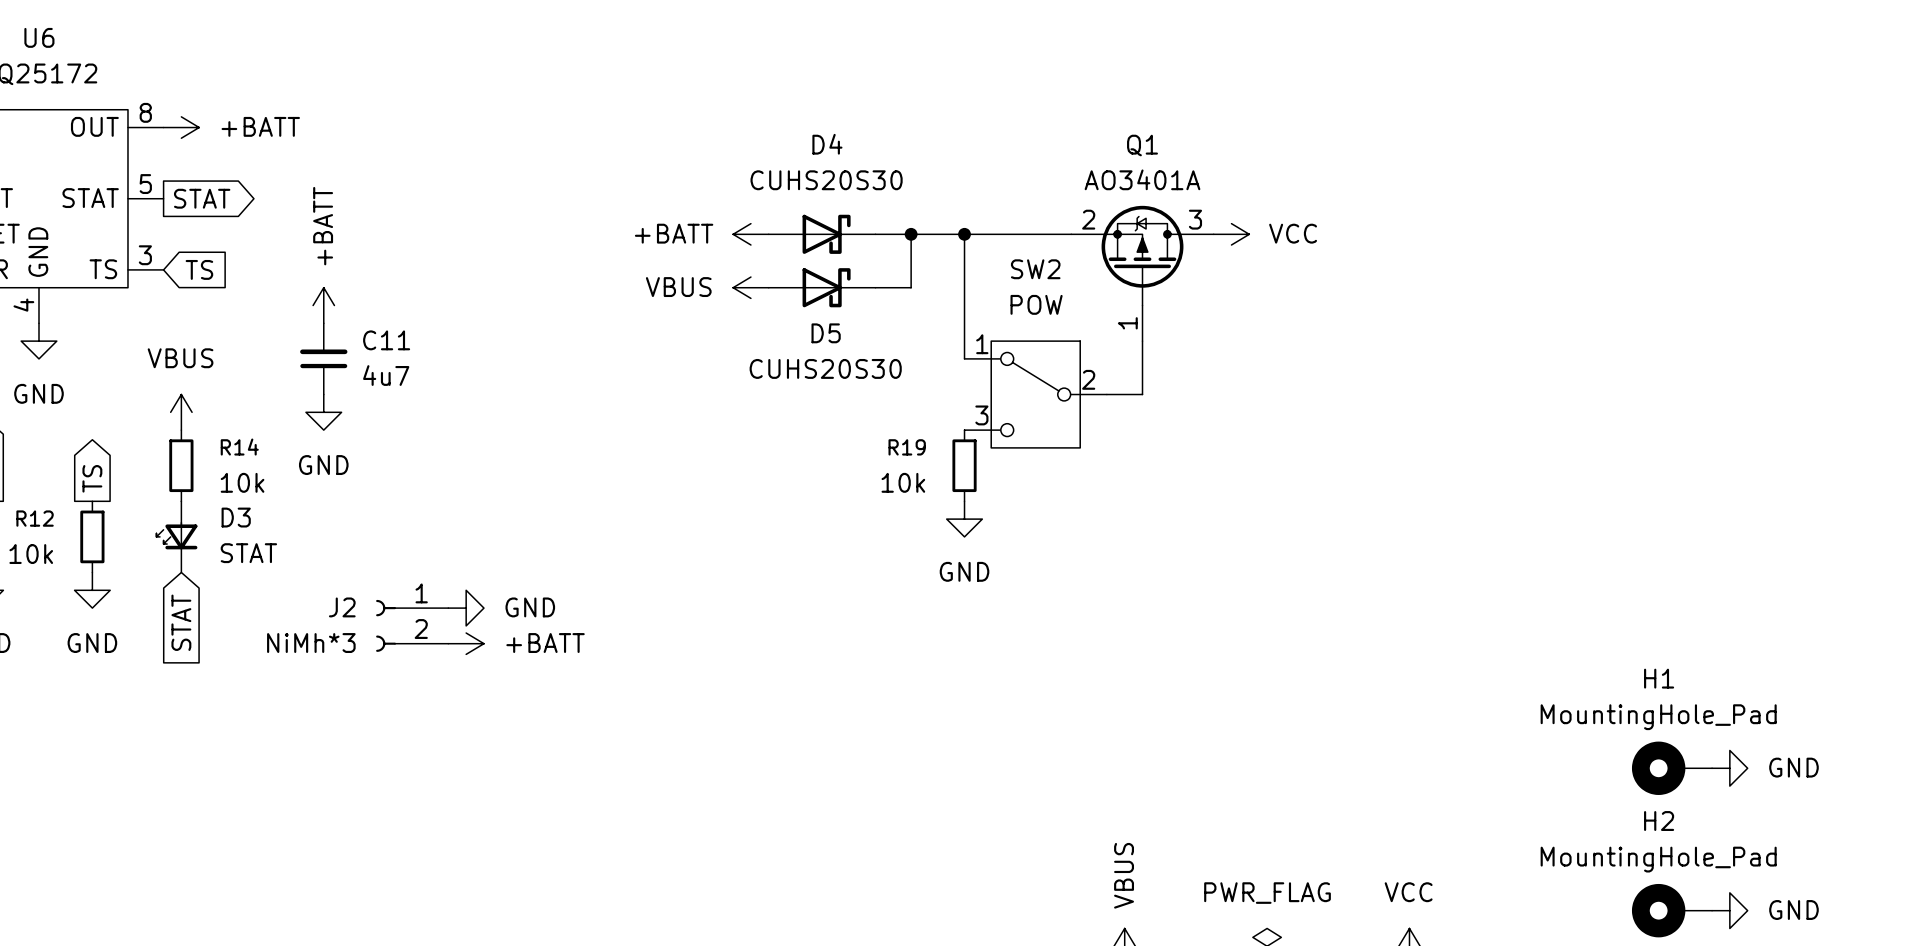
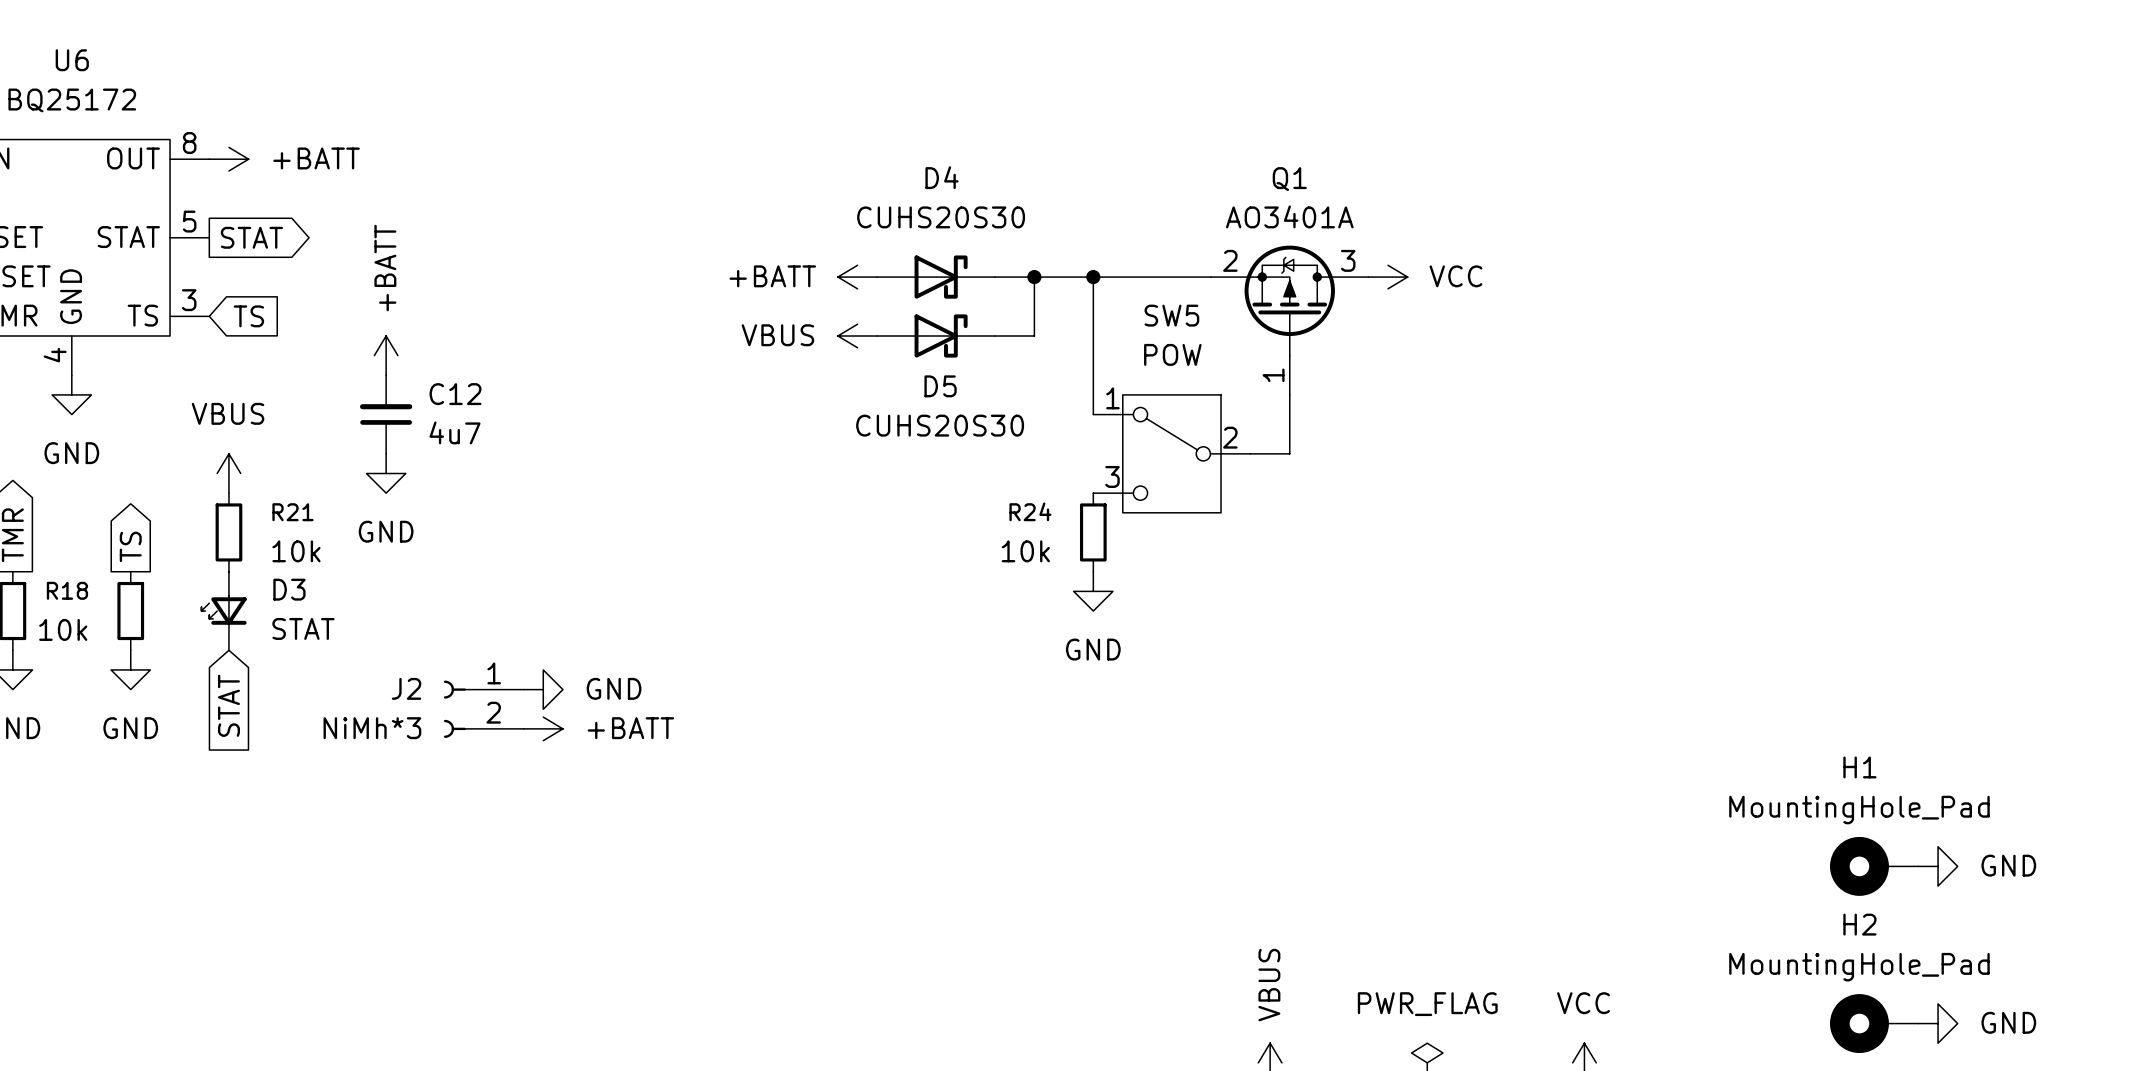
SW2 name: SW2 (1035, 269) -> SW5 (1171, 315)
C11 name: C11 (386, 340) -> C12 (455, 394)
R14 name: R14 (239, 447) -> R21 (293, 512)
R19 name: R19 (907, 447) -> R24 (1030, 511)
R12 name: R12 (35, 518) -> R18 (67, 590)

